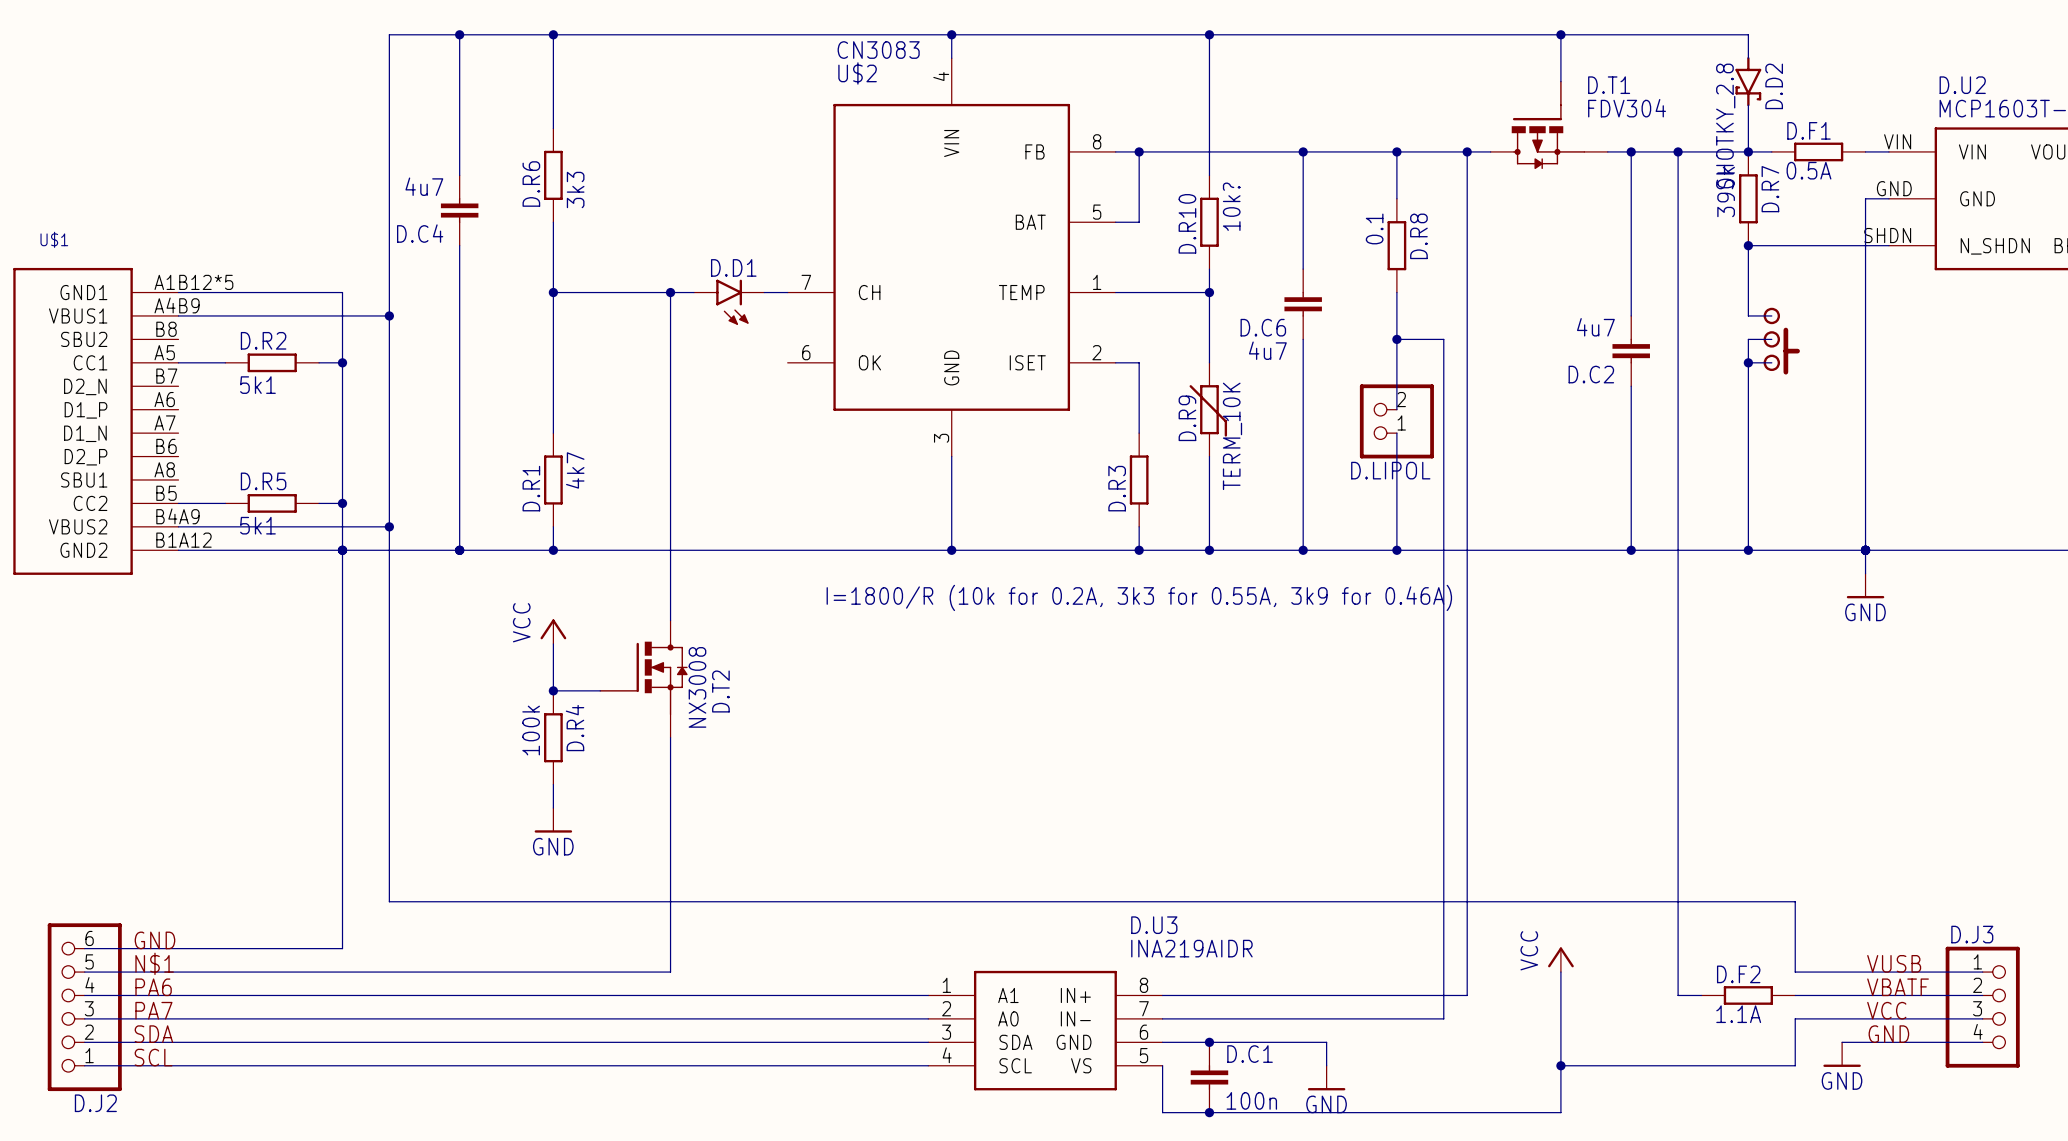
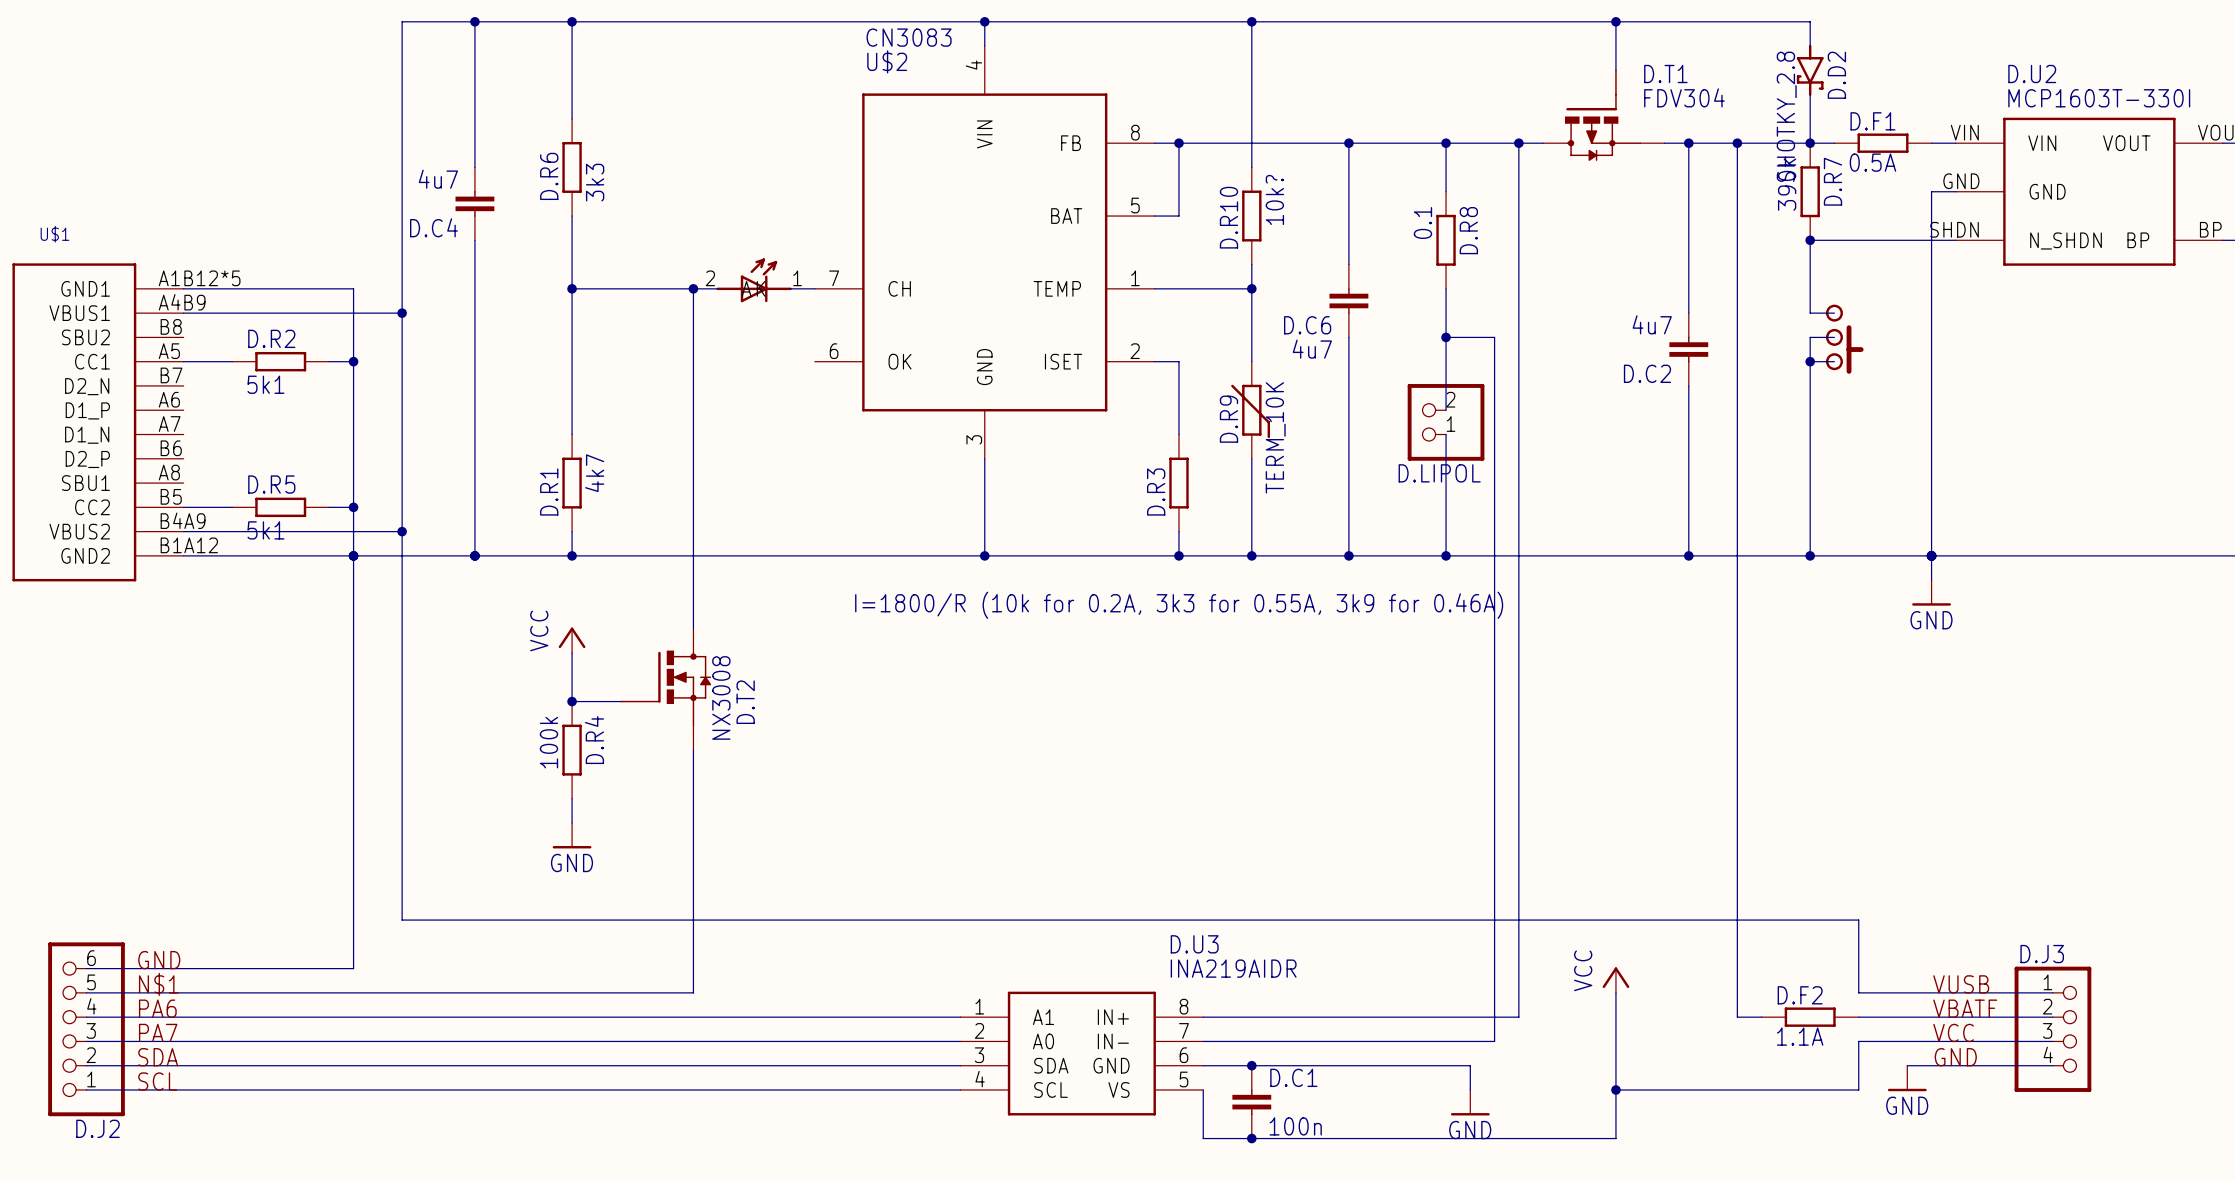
part: none -> (754, 280)
D.D1: (729, 302) -> none
wire: (1326, 1042) (1326, 1065) -> (1373, 1065) (1470, 1065) (1470, 1089)
power symbol position: GND (1326, 1078) -> GND (1470, 1102)

